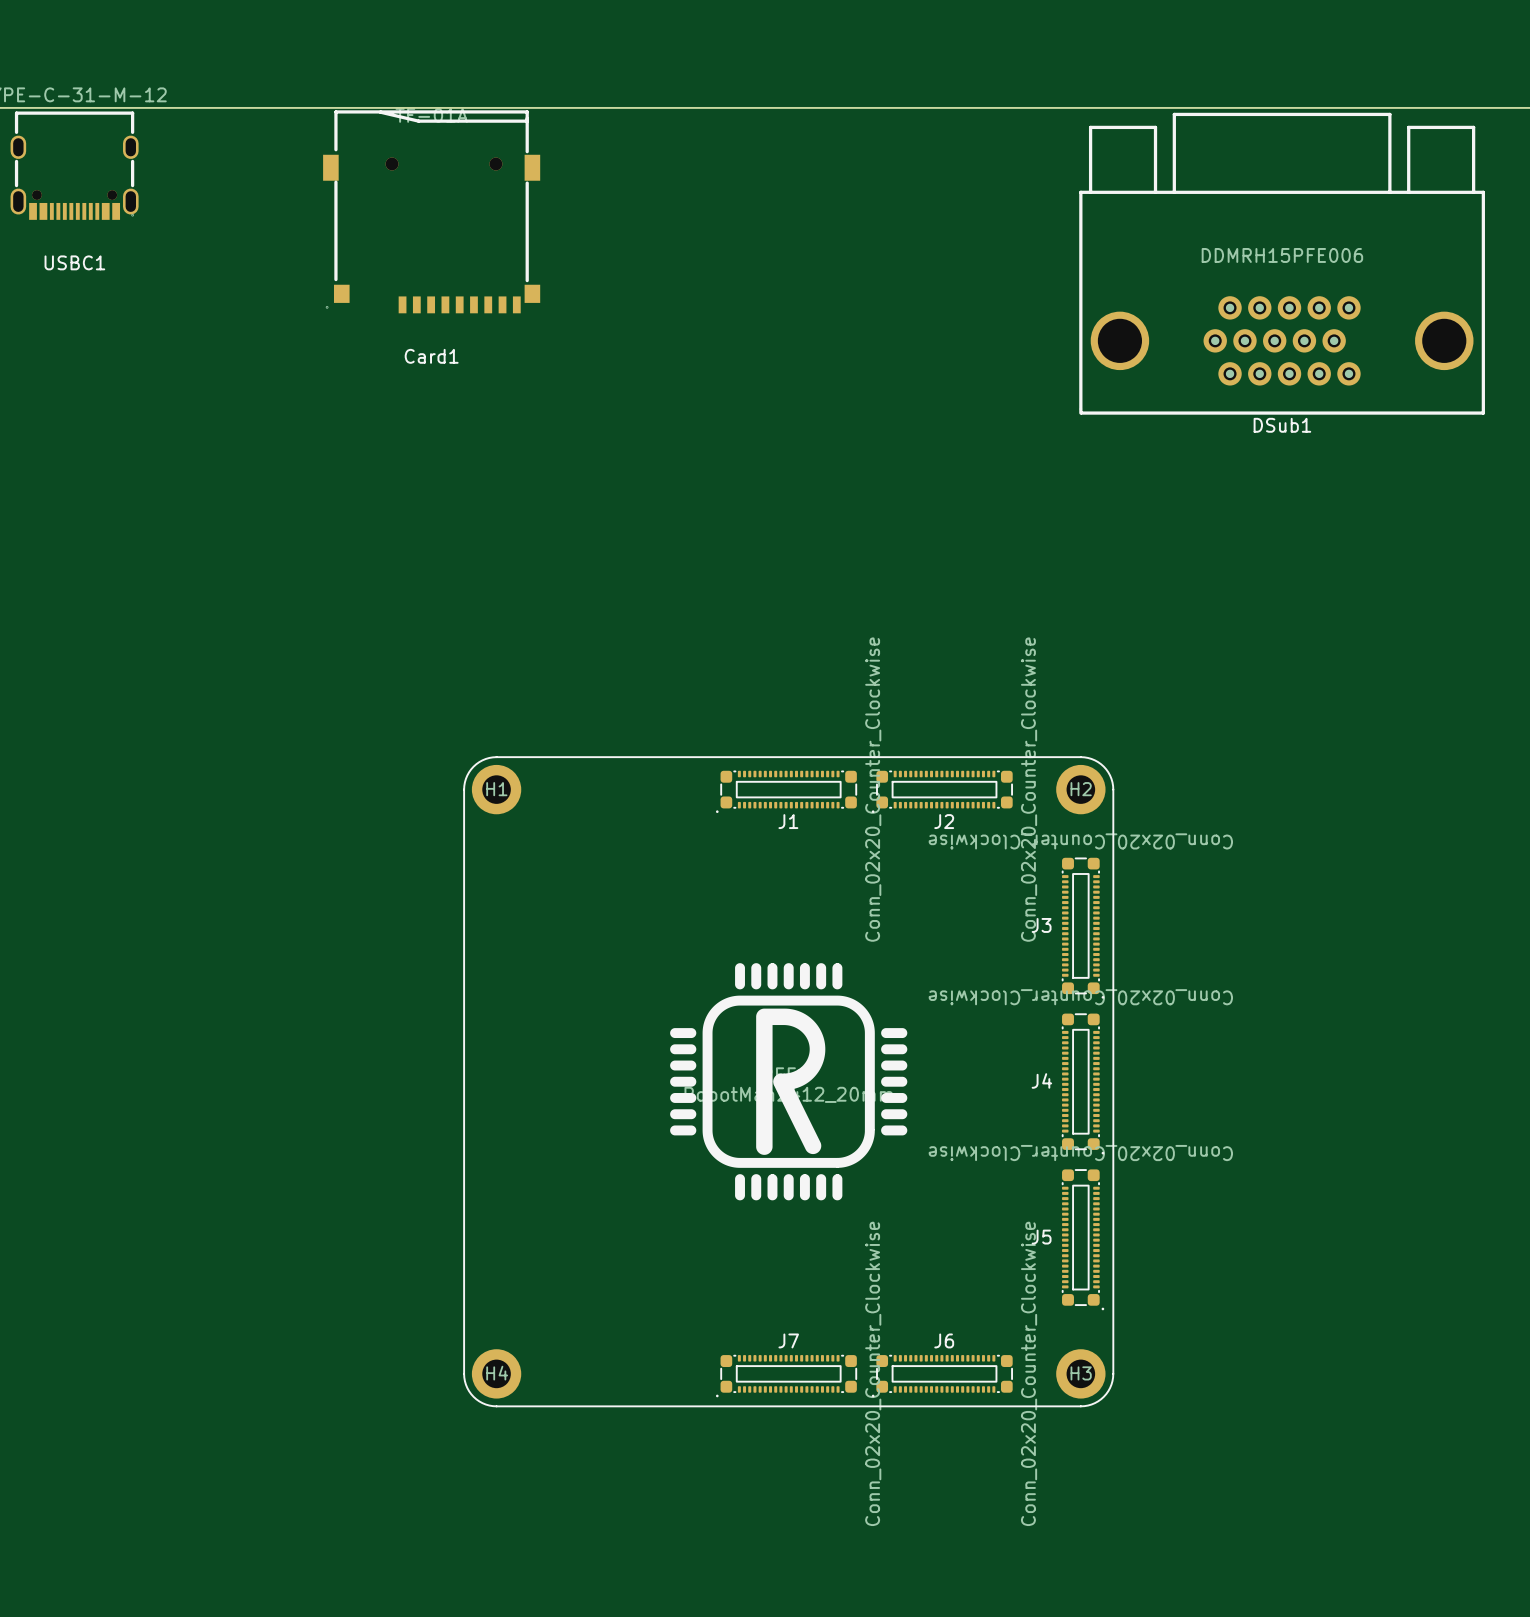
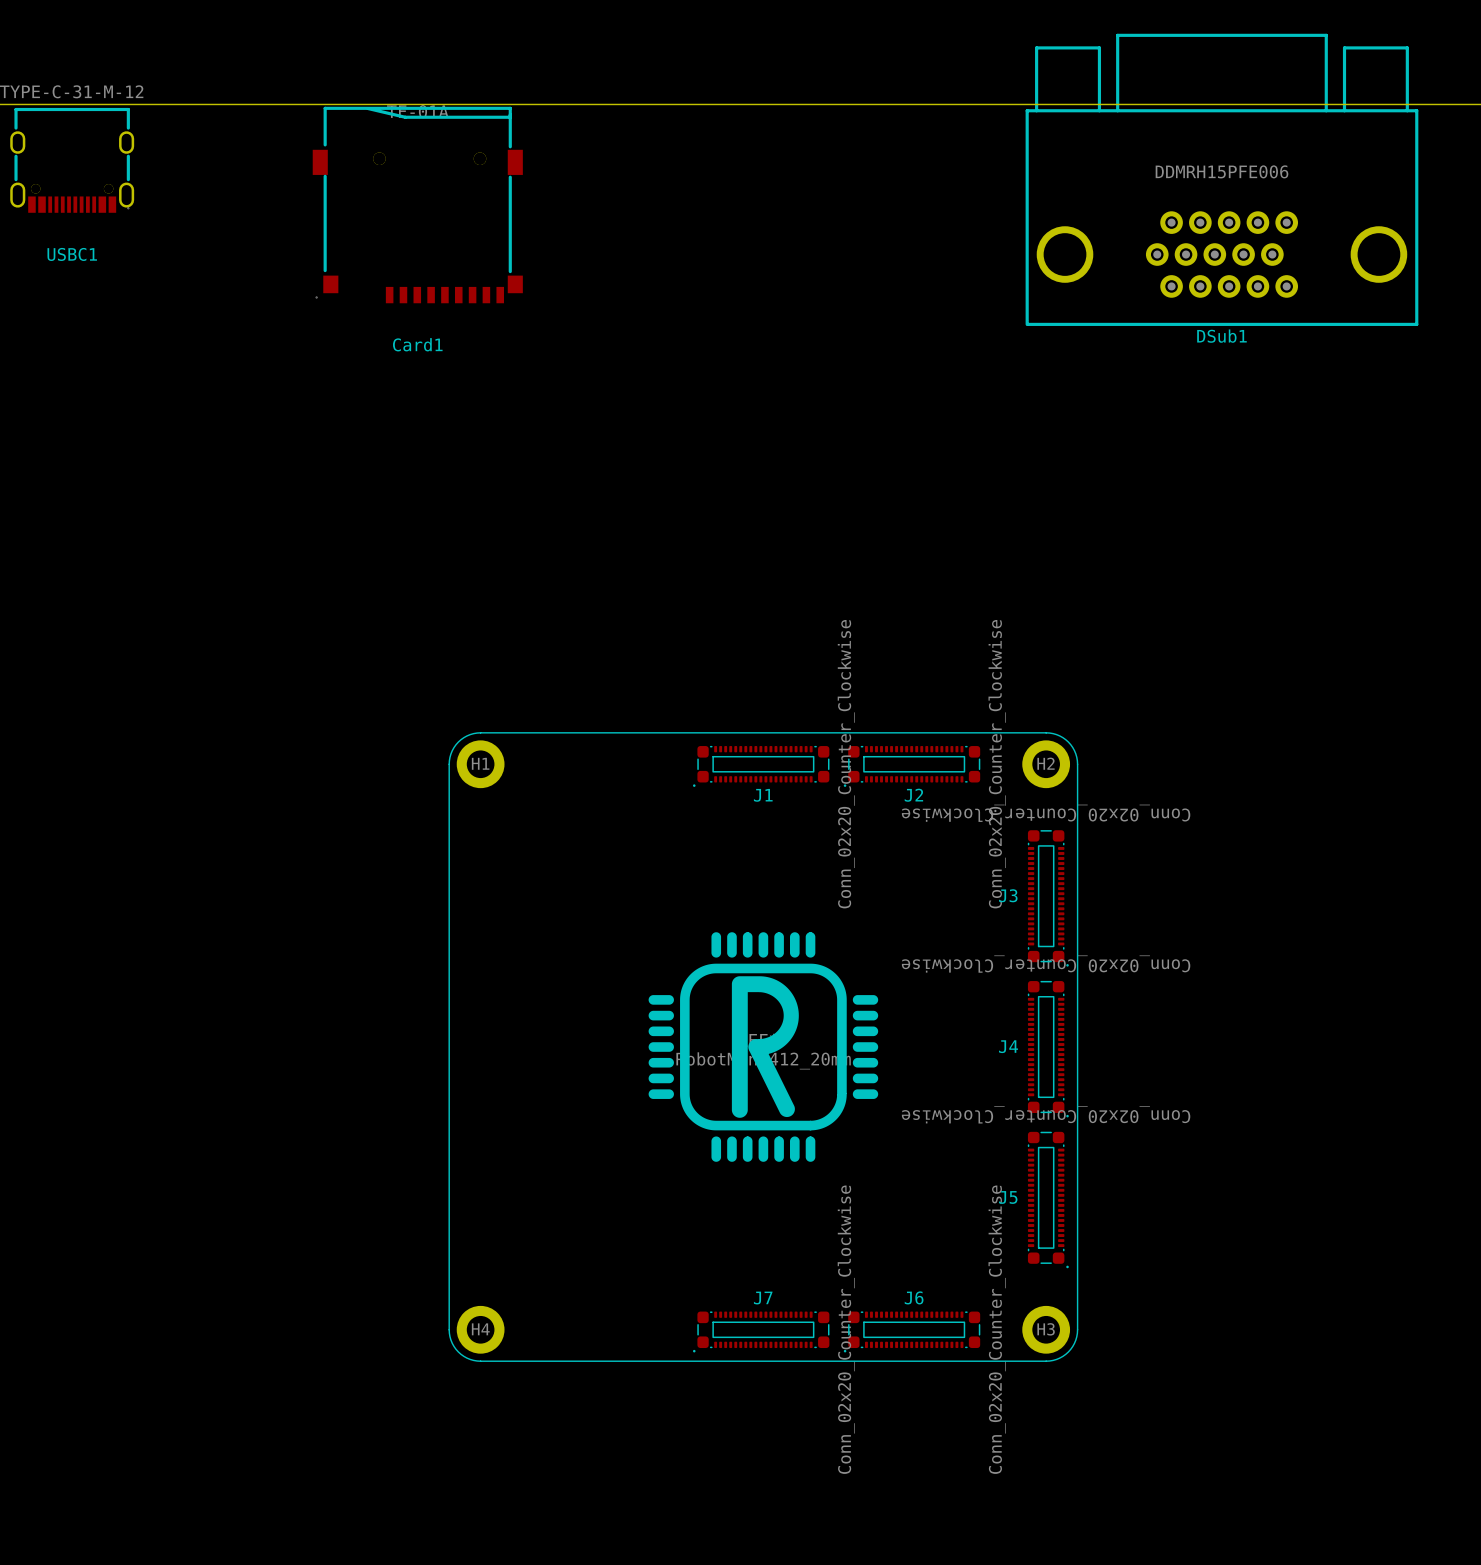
DSub1 position: (1282, 263) -> (1221, 179)

